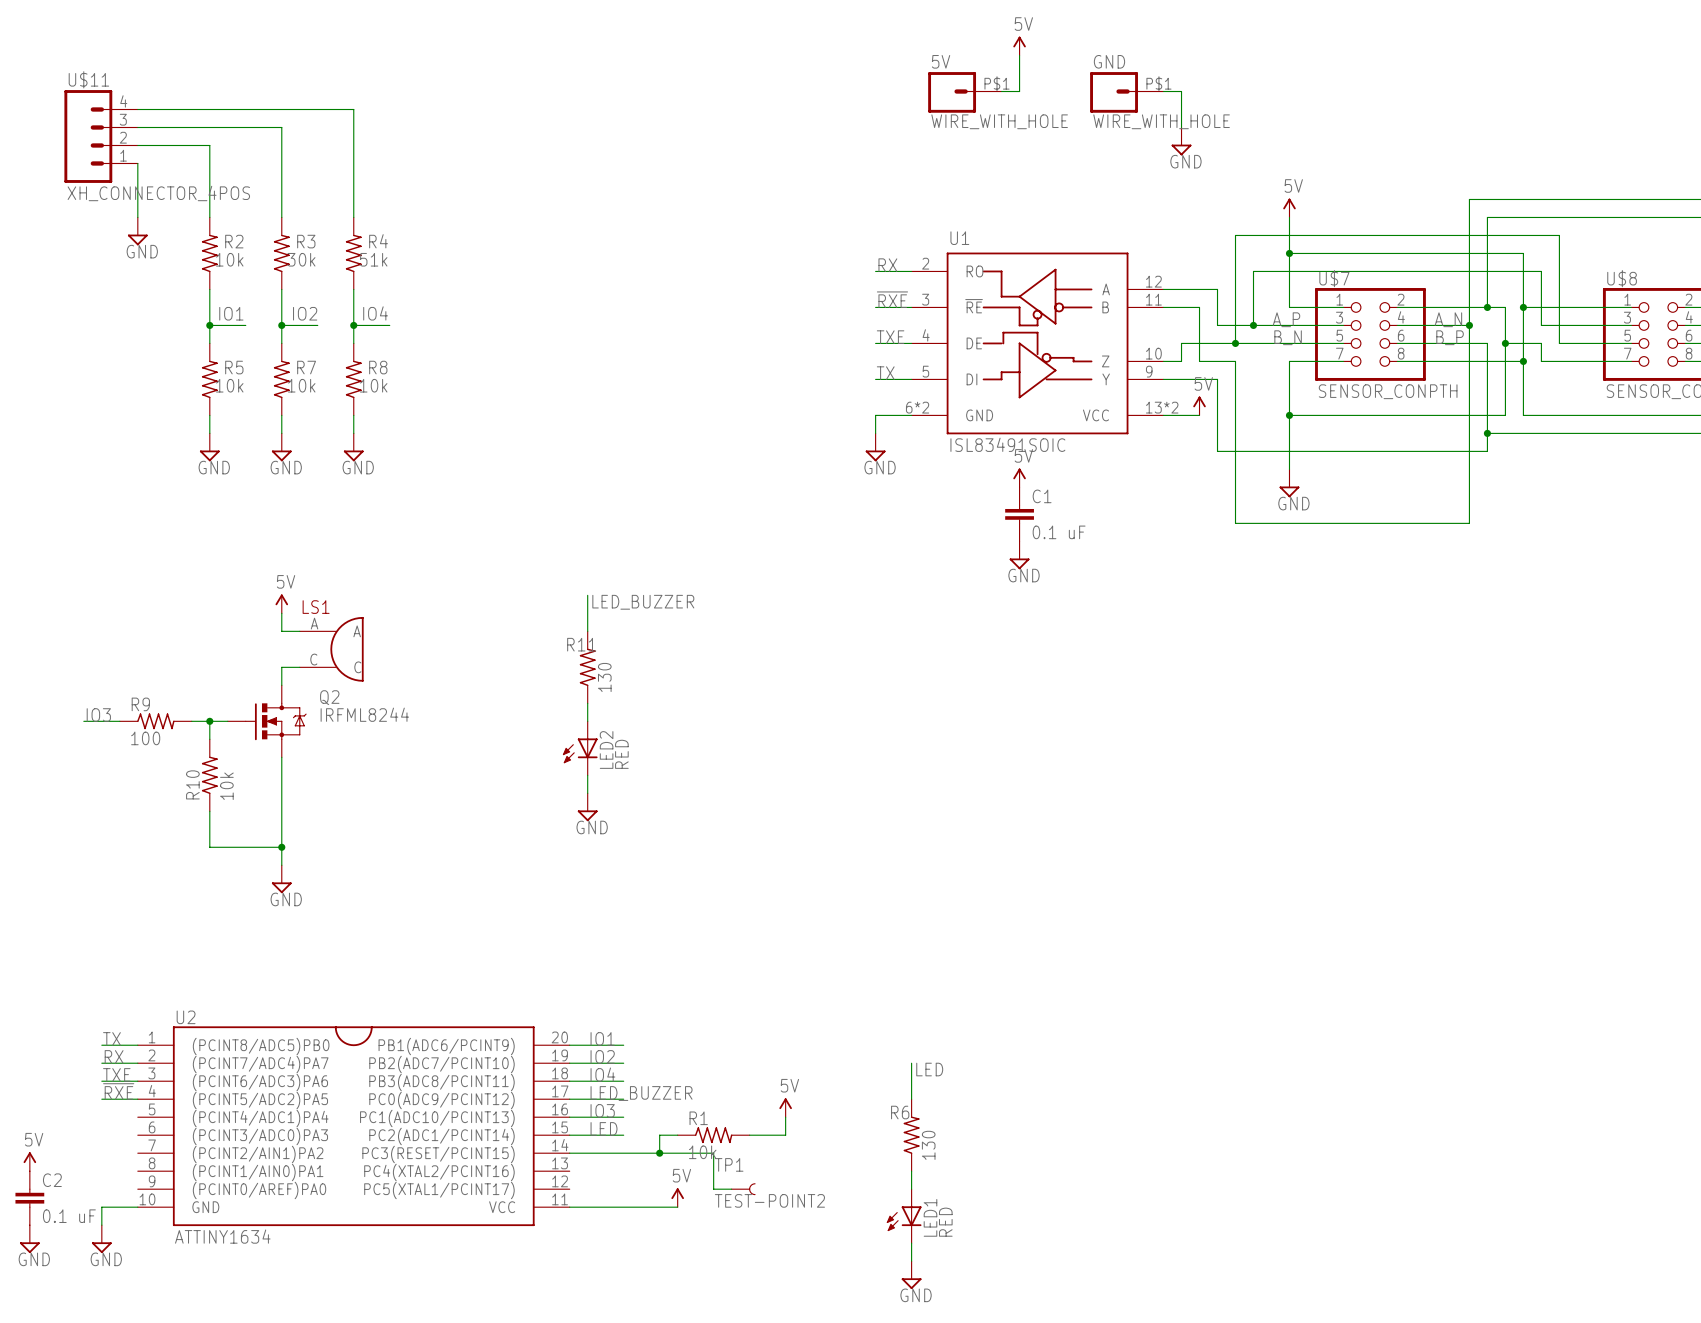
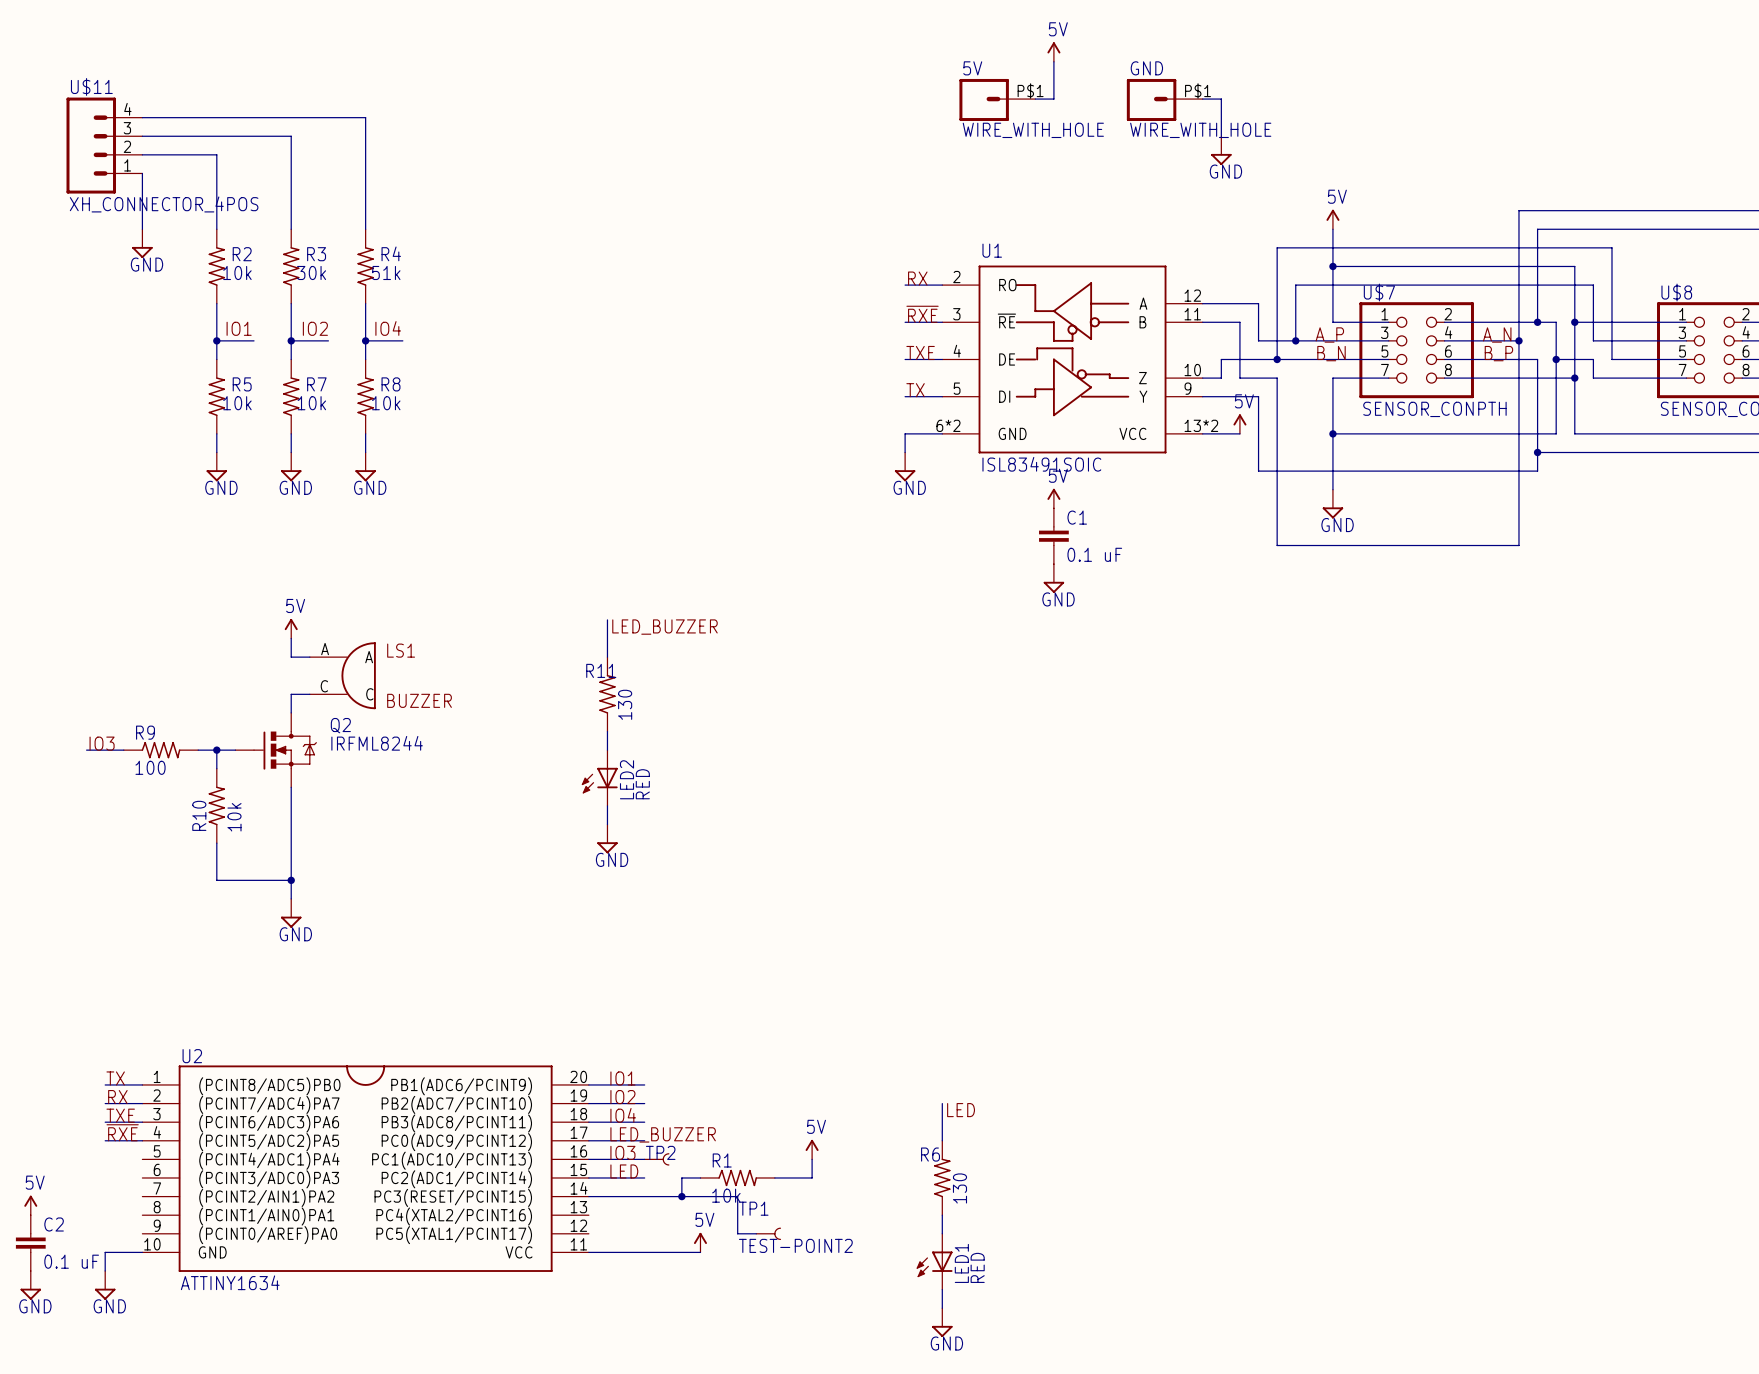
LS1 name position: LS1 (316, 607) -> LS1 (401, 650)
LS1 value: none -> BUZZER (419, 700)
TP2: none -> (656, 1159)

